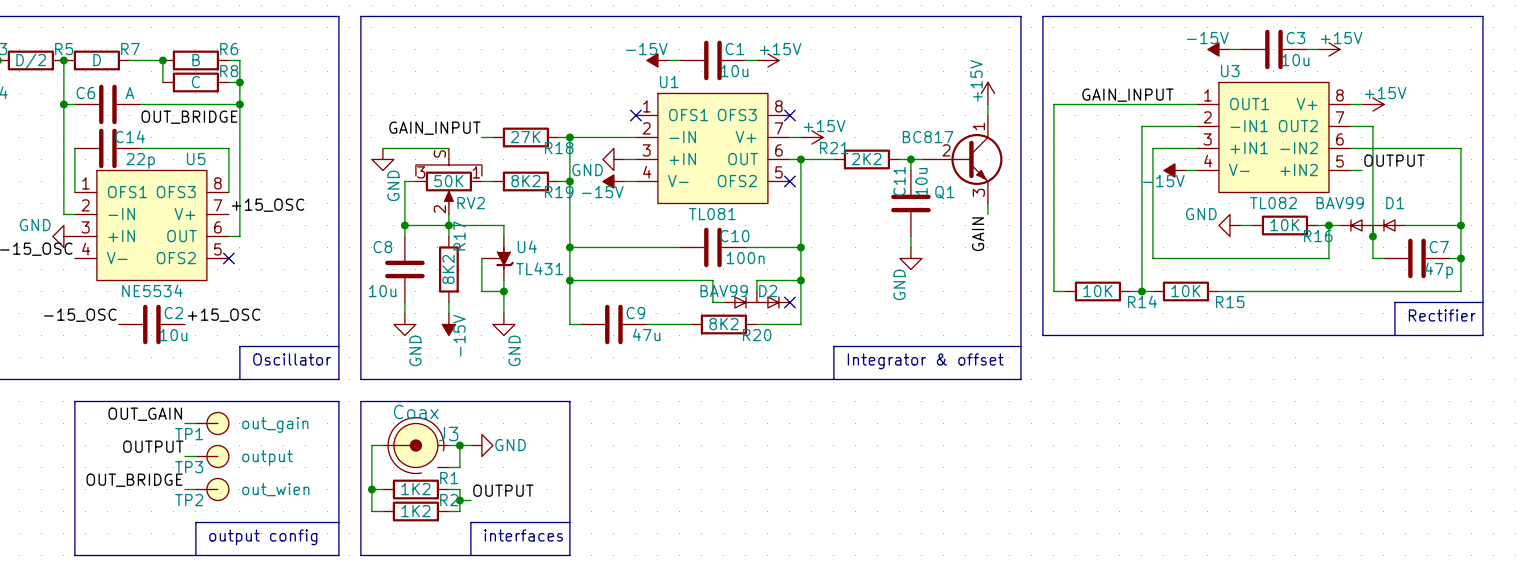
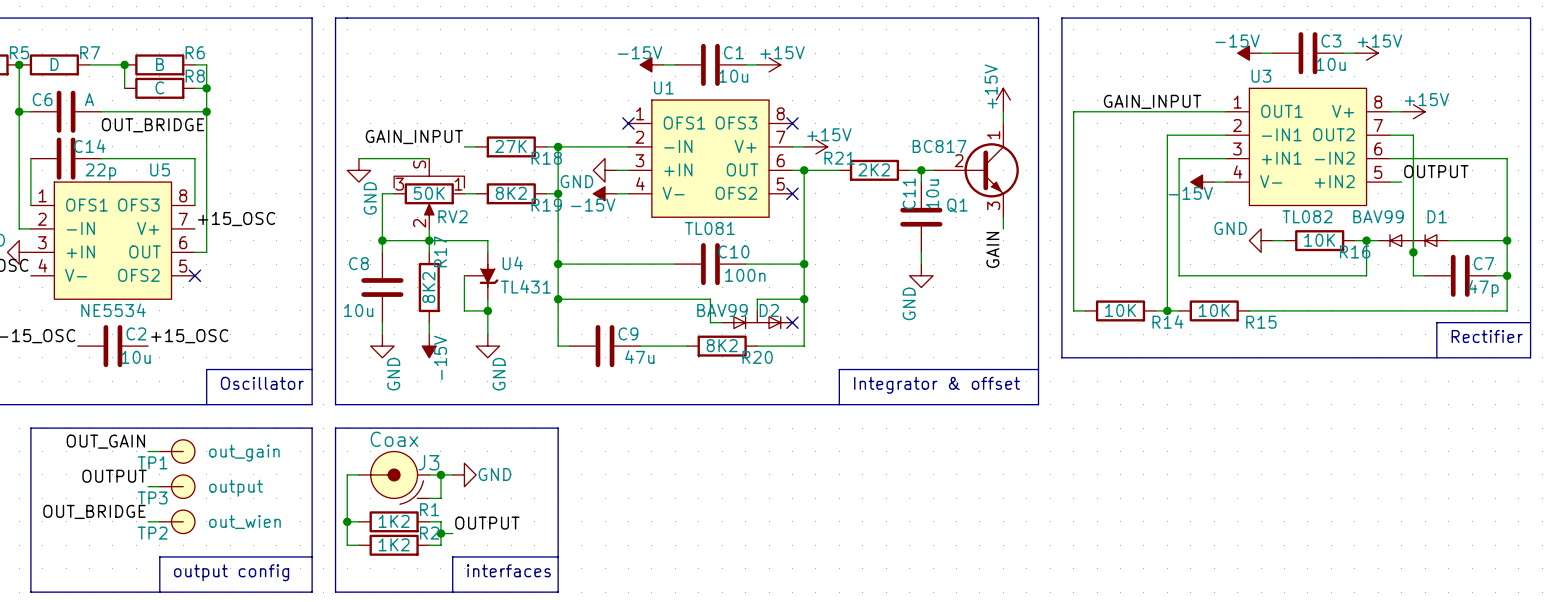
J3 symbol: [382, 417, 449, 474] -> [358, 451, 430, 505]

